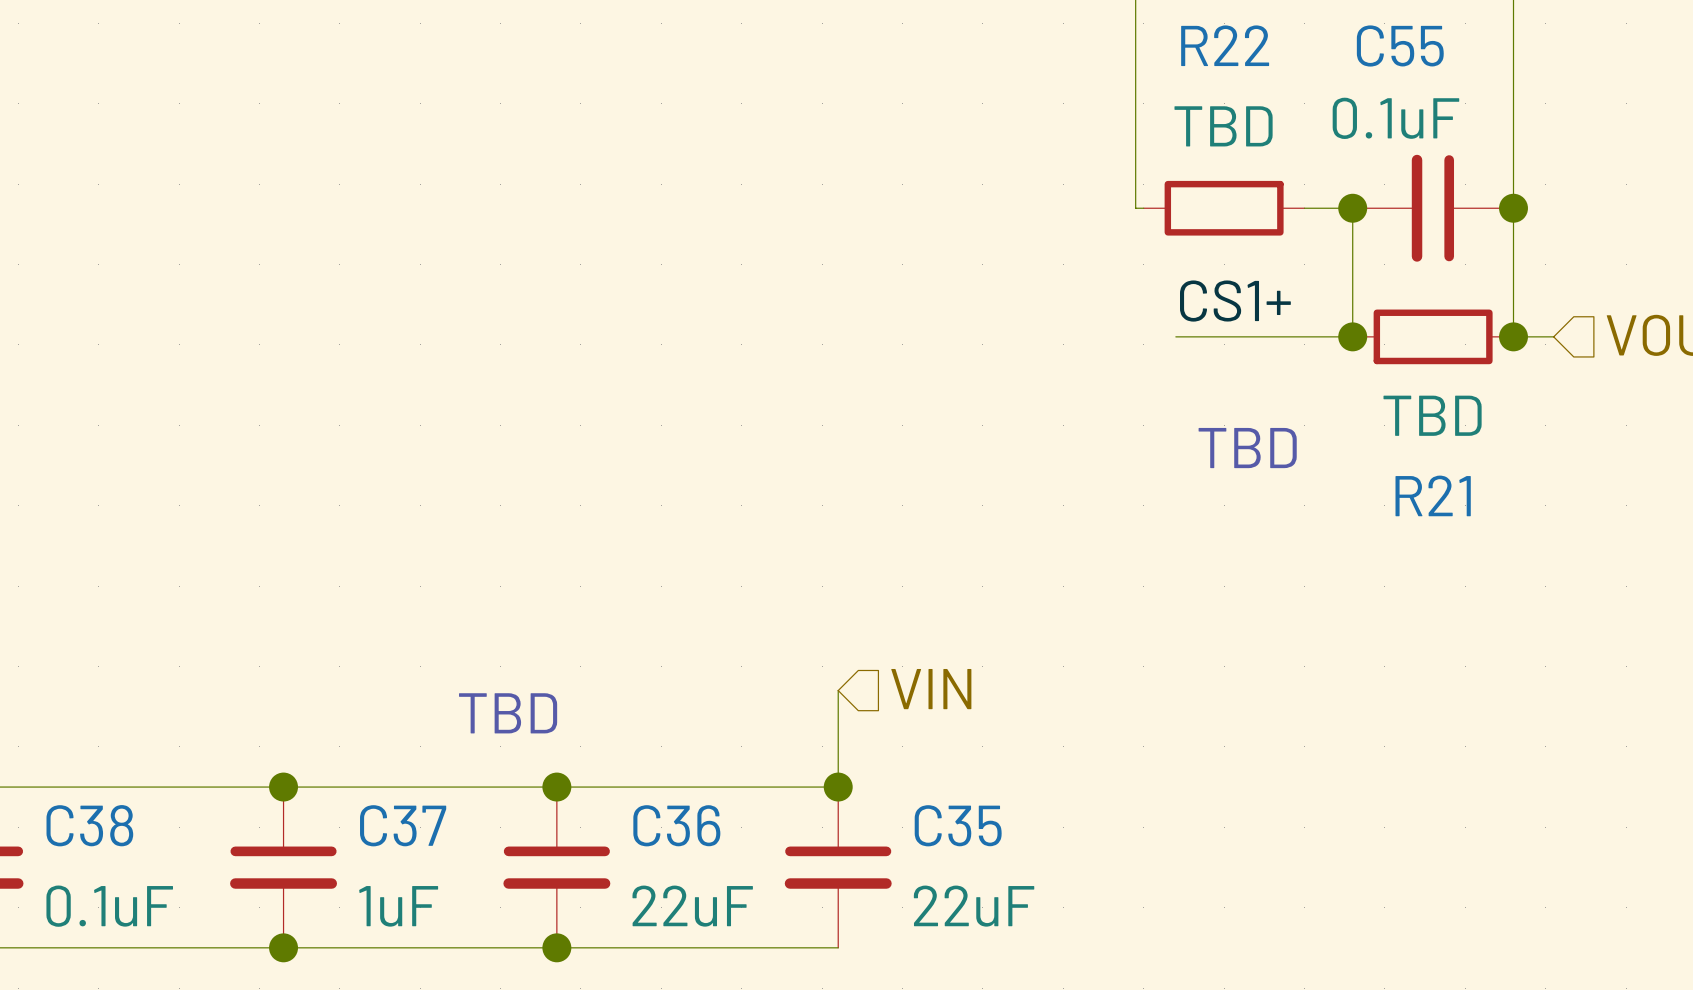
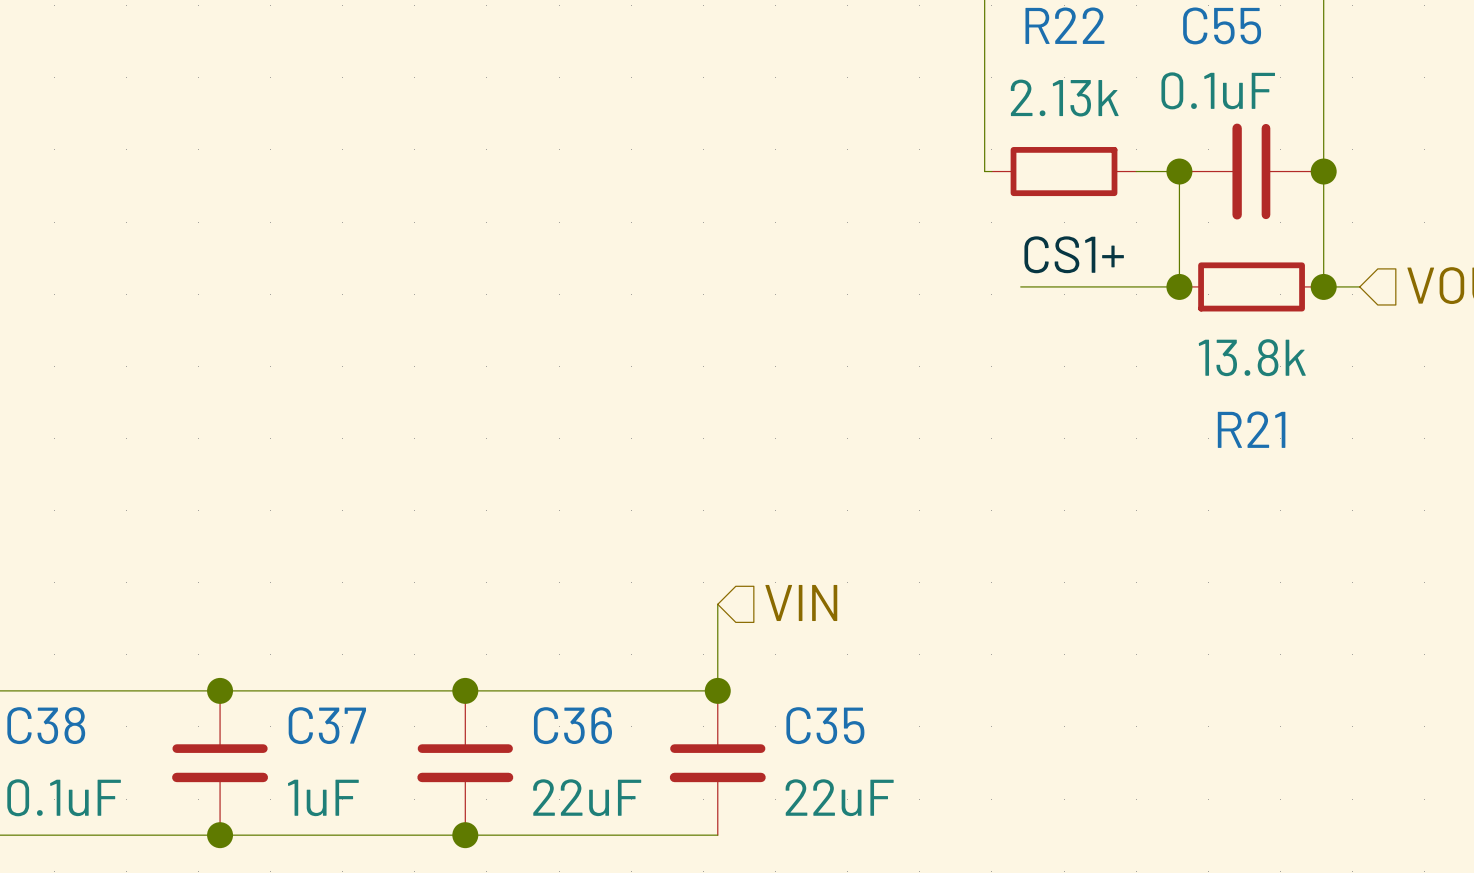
R22 value: TBD (1223, 126) -> 2.13k (1064, 98)
R21 value: TBD (1432, 415) -> 13.8k (1252, 357)
text: TBD (1247, 448) -> none
text: TBD (508, 713) -> none

